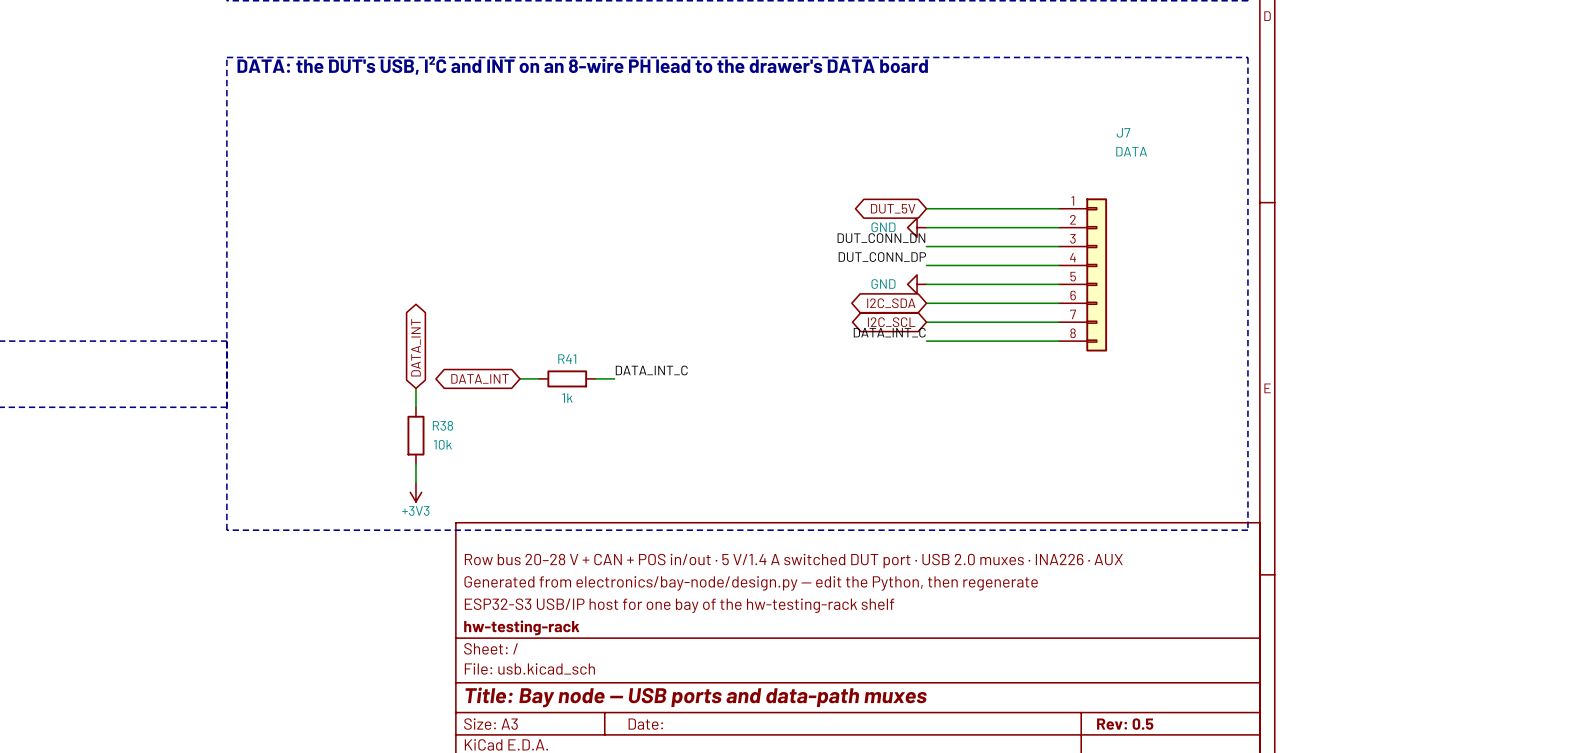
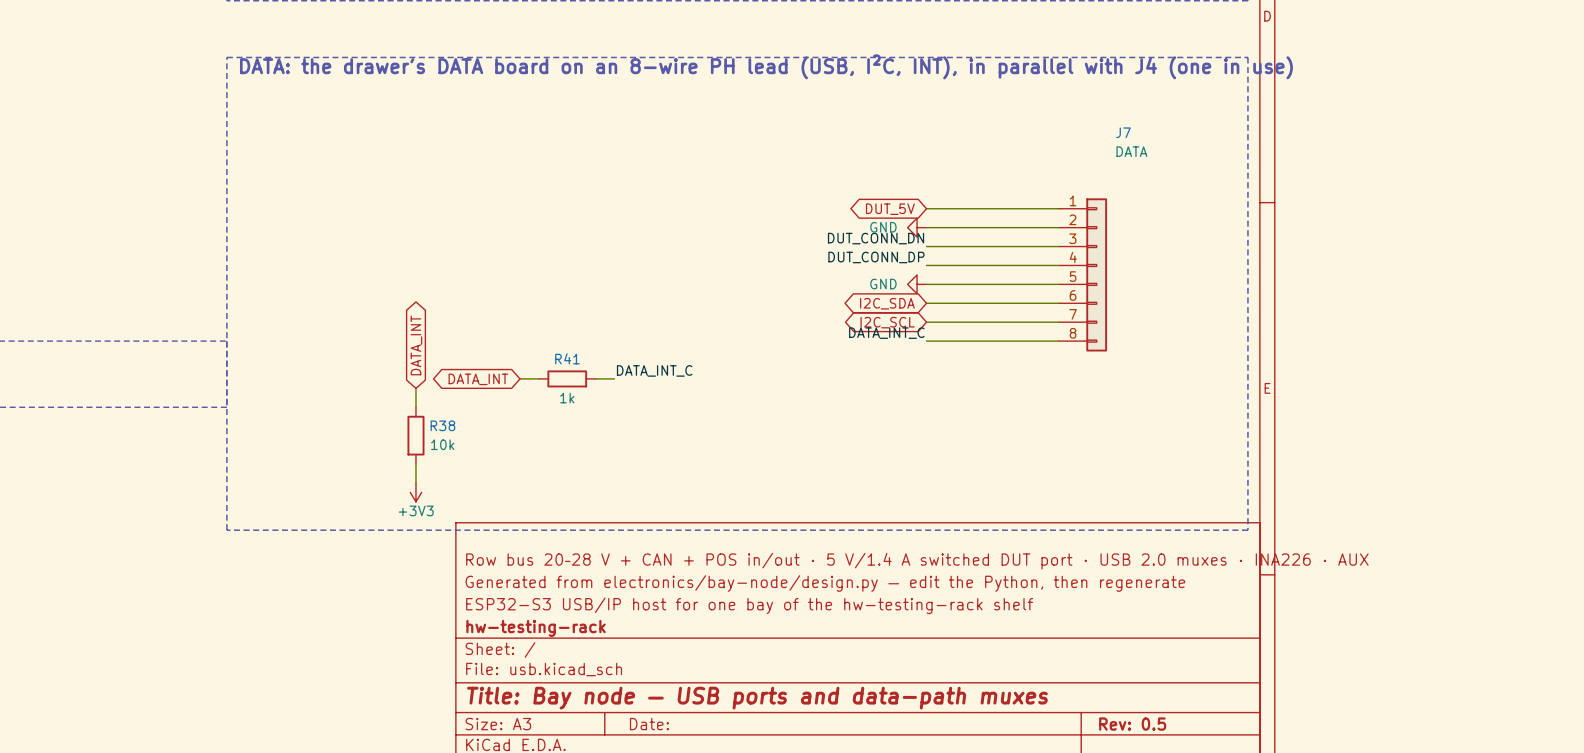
text: DATA: the DUT's USB, I²C and INT on an 8-wire PH lead to the drawer's DATA board (582, 65) -> DATA: the drawer's DATA board on an 8-wire PH lead (USB, I²C, INT), in parallel with J4 (one in use) (766, 66)

